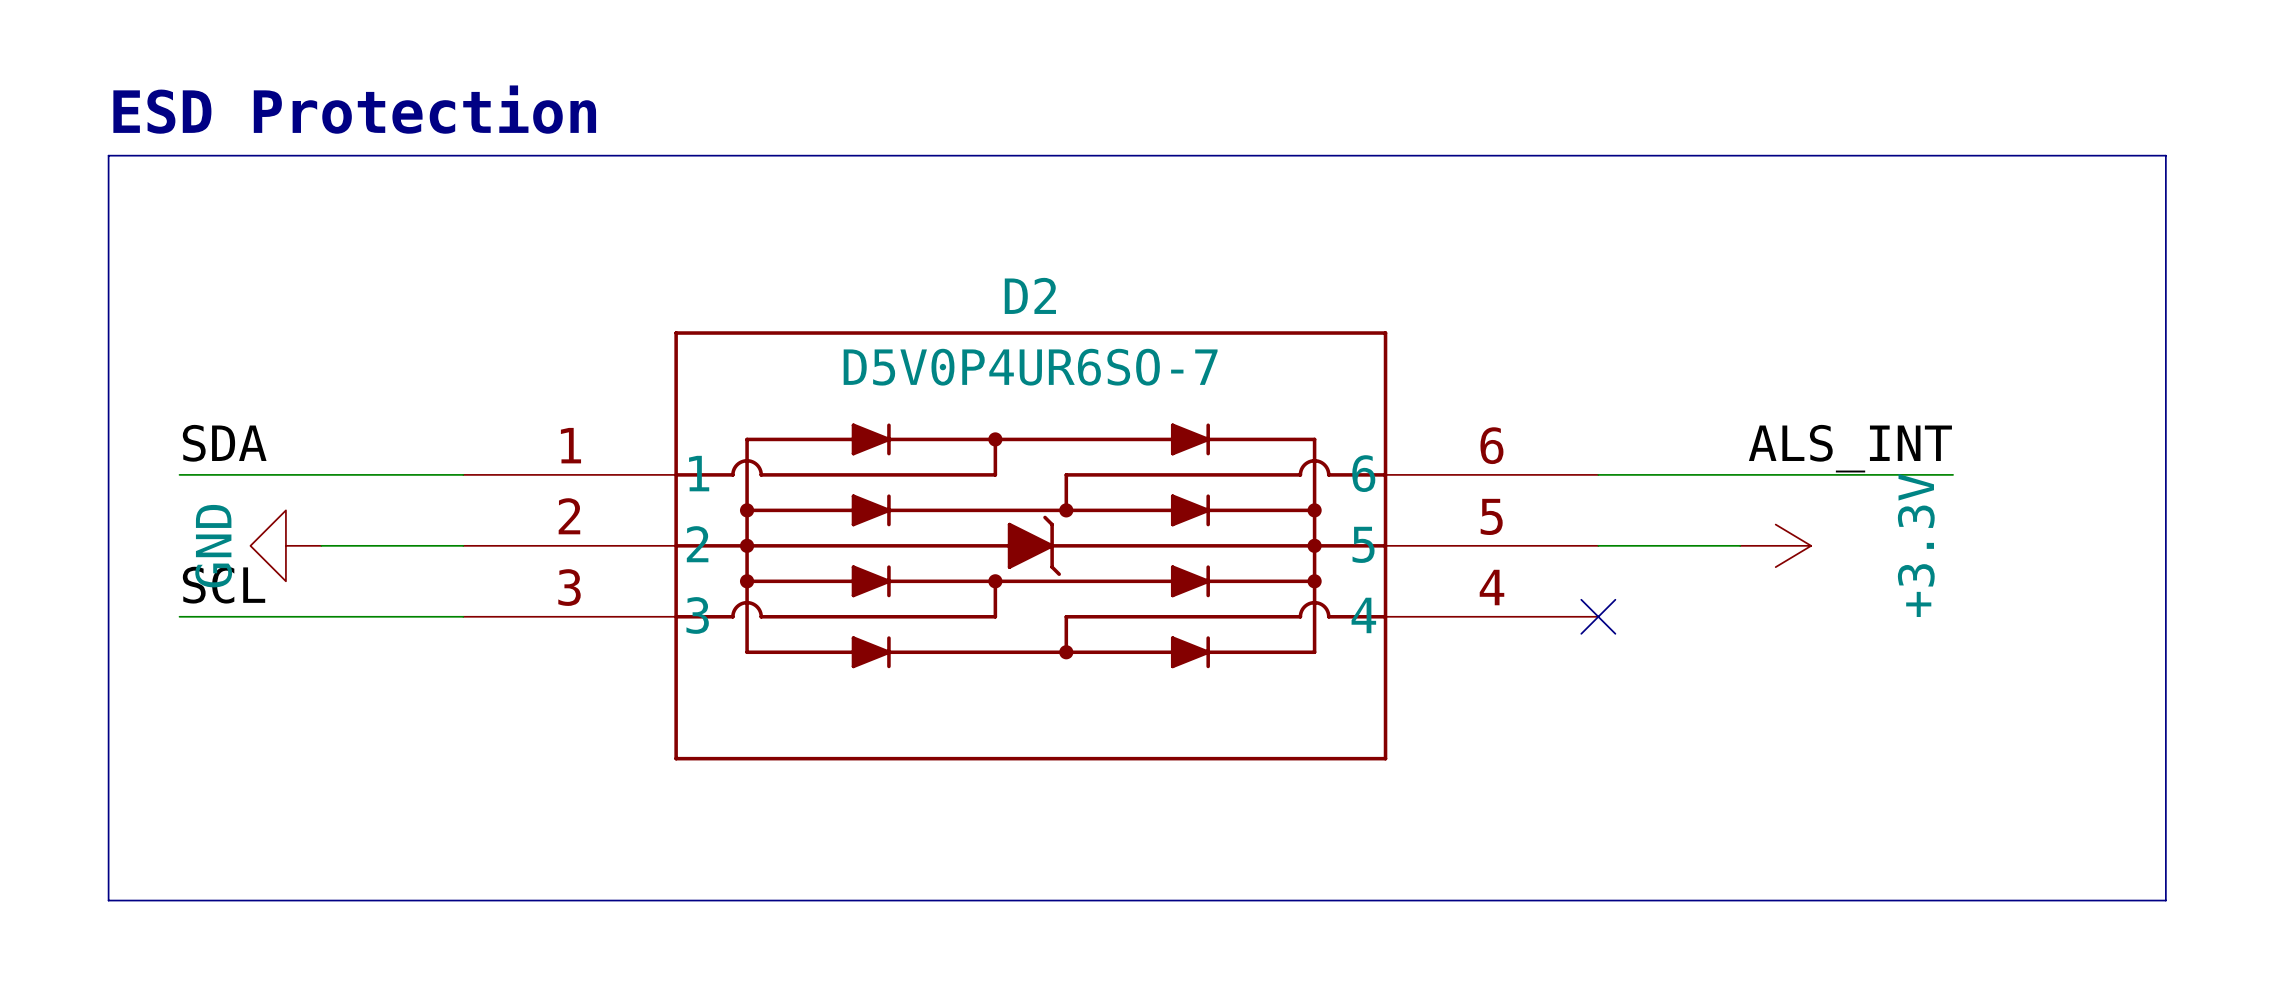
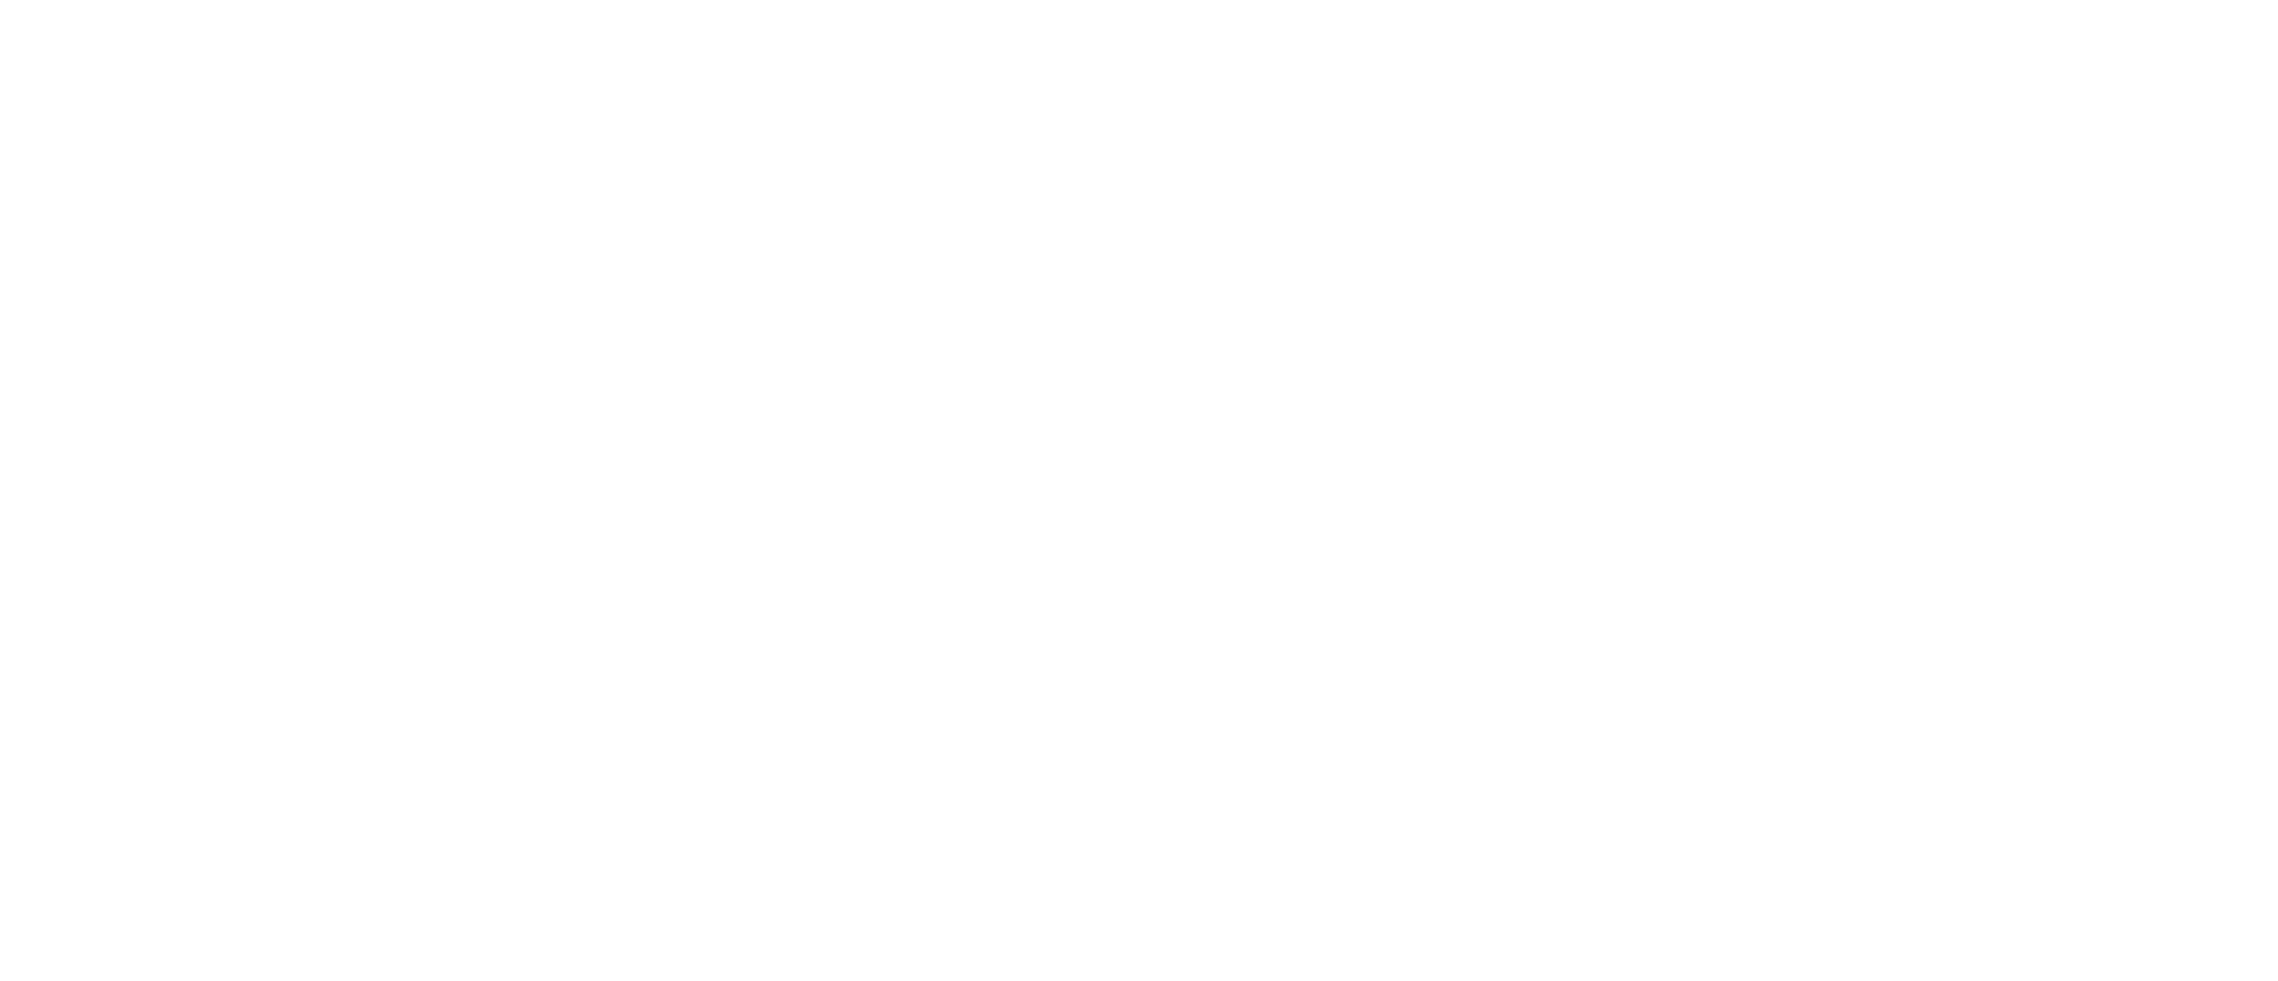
text: ESD Protection (354, 109) -> none
line: (108, 155) (2165, 155) (2165, 900) (108, 900) (108, 155) -> none
label: SDA (224, 443) -> none
label: ALS_INT (1850, 448) -> none
wire: (179, 474) (463, 474) -> none
wire: (1598, 474) (1953, 474) -> none
power symbol: GND (285, 545) -> none
wire: (321, 545) (463, 545) -> none
D2: D5V0P4UR6SO-7 (1030, 545) -> none
wire: (1598, 545) (1740, 545) -> none
power symbol: +3.3V (1775, 545) -> none
label: SCL (224, 585) -> none
wire: (179, 616) (463, 616) -> none
no-connect mark: (1598, 616) -> none

